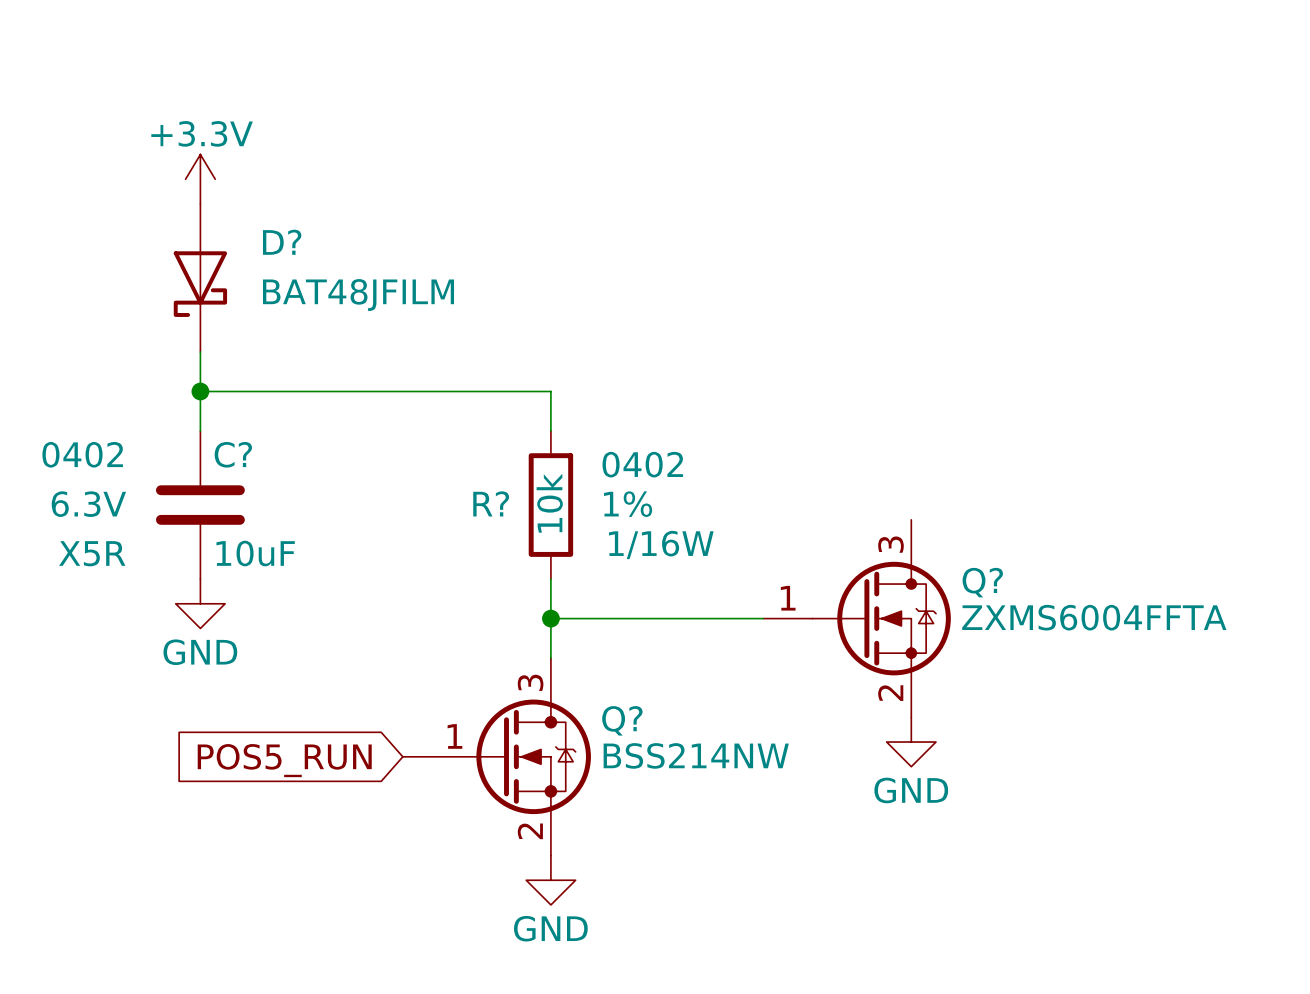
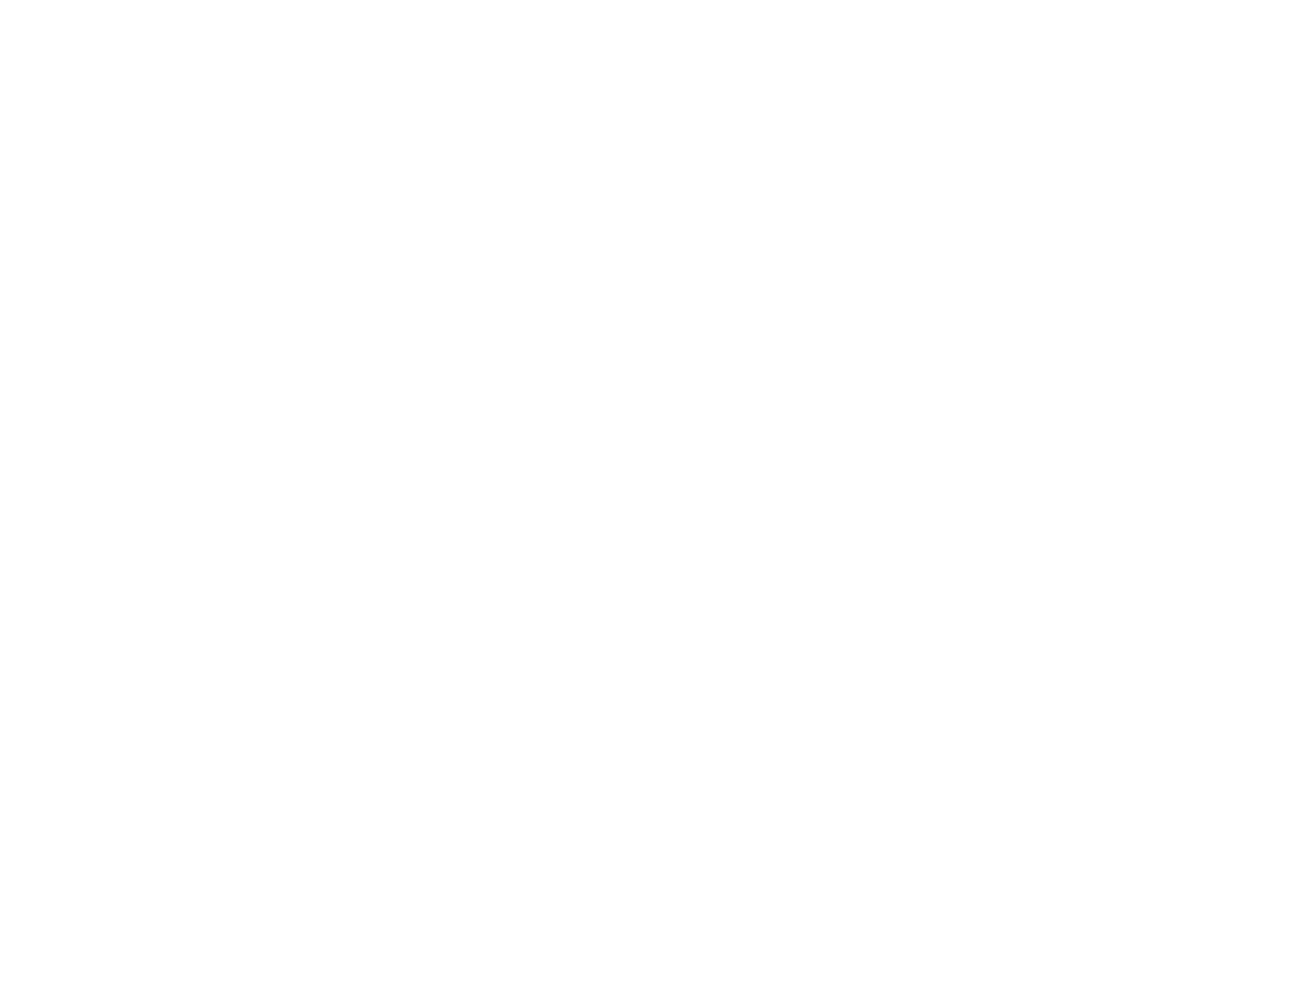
power symbol: +3.3V (200, 179) -> none
D?: BAT48JFILM (200, 277) -> none
wire: (200, 352) (200, 430) -> none
wire: (200, 391) (550, 391) (550, 430) -> none
junction: (200, 391) -> none
C?: 10uF (200, 505) -> none
R?: 10k (550, 505) -> none
wire: (550, 579) (550, 658) -> none
power symbol: GND (200, 603) -> none
wire: (550, 618) (763, 618) -> none
junction: (550, 618) -> none
Q?: ZXMS6004FFTA (857, 618) -> none
power symbol: GND (911, 742) -> none
Q?: BSS214NW (496, 756) -> none
global label: POS5_RUN (284, 760) -> none
power symbol: GND (550, 880) -> none

